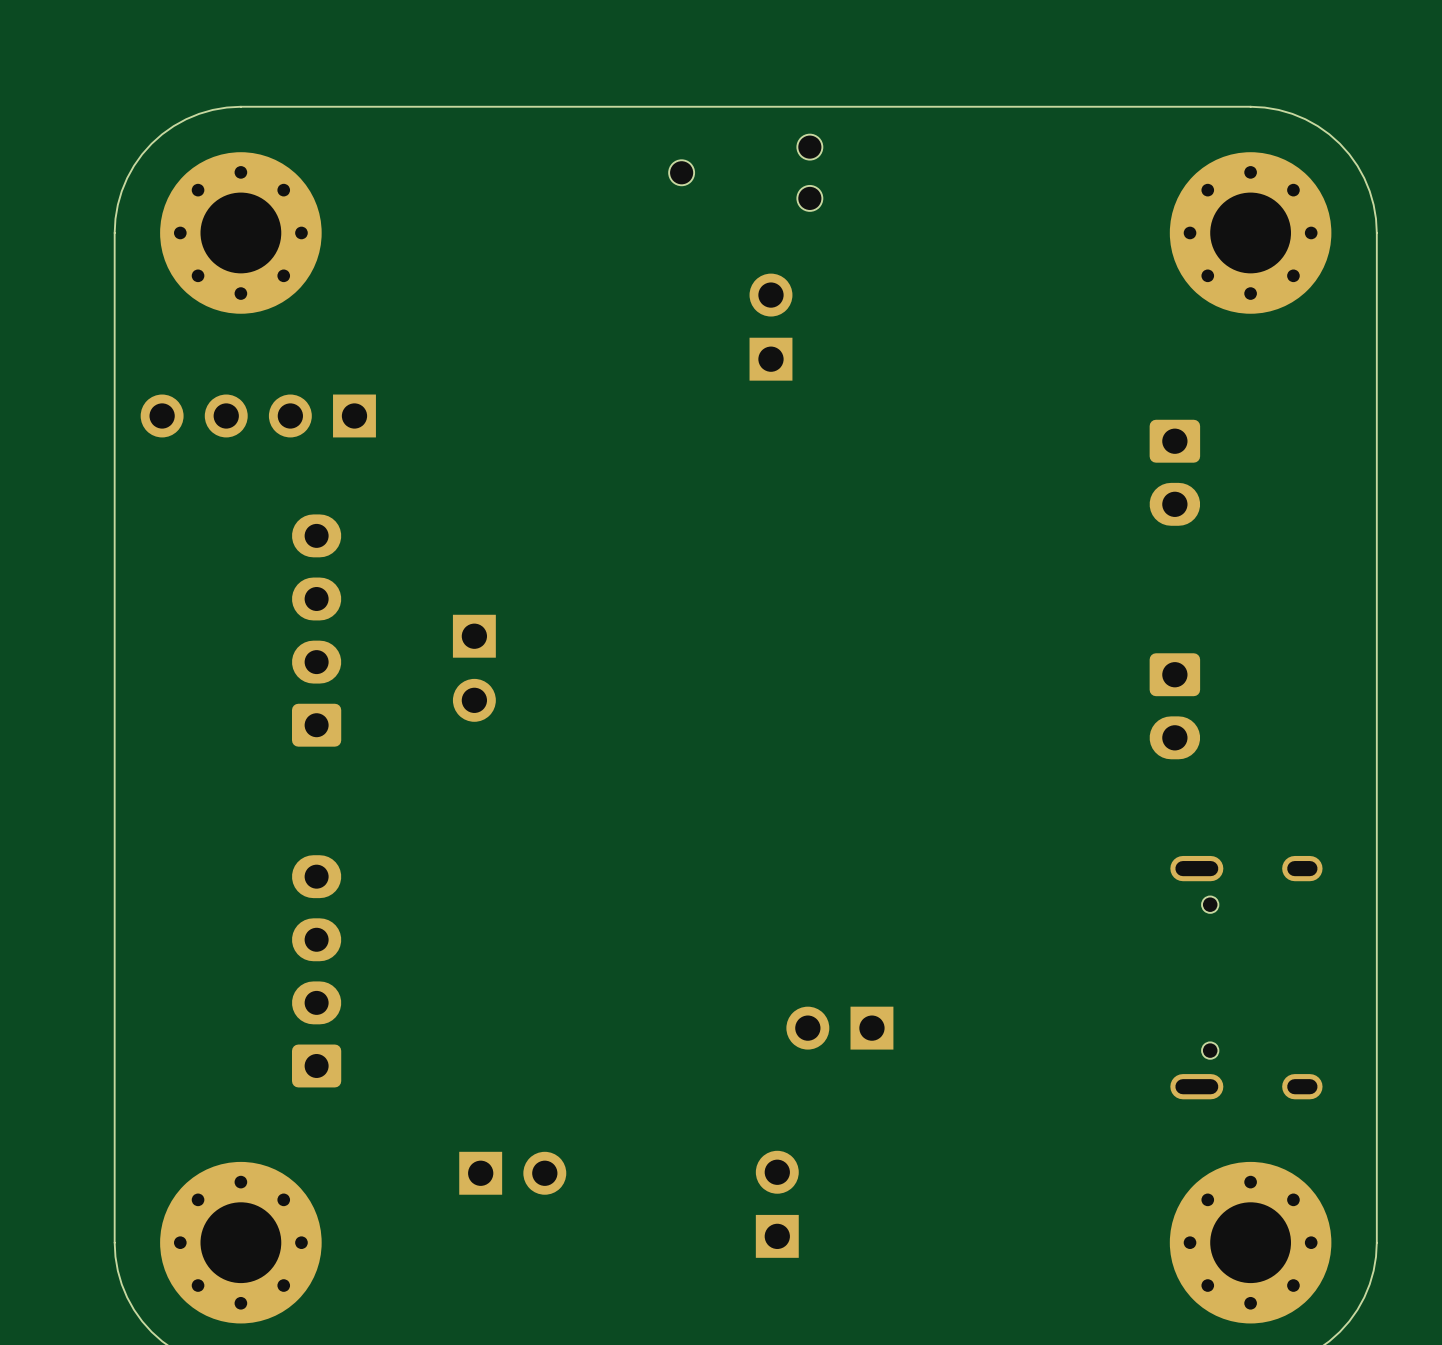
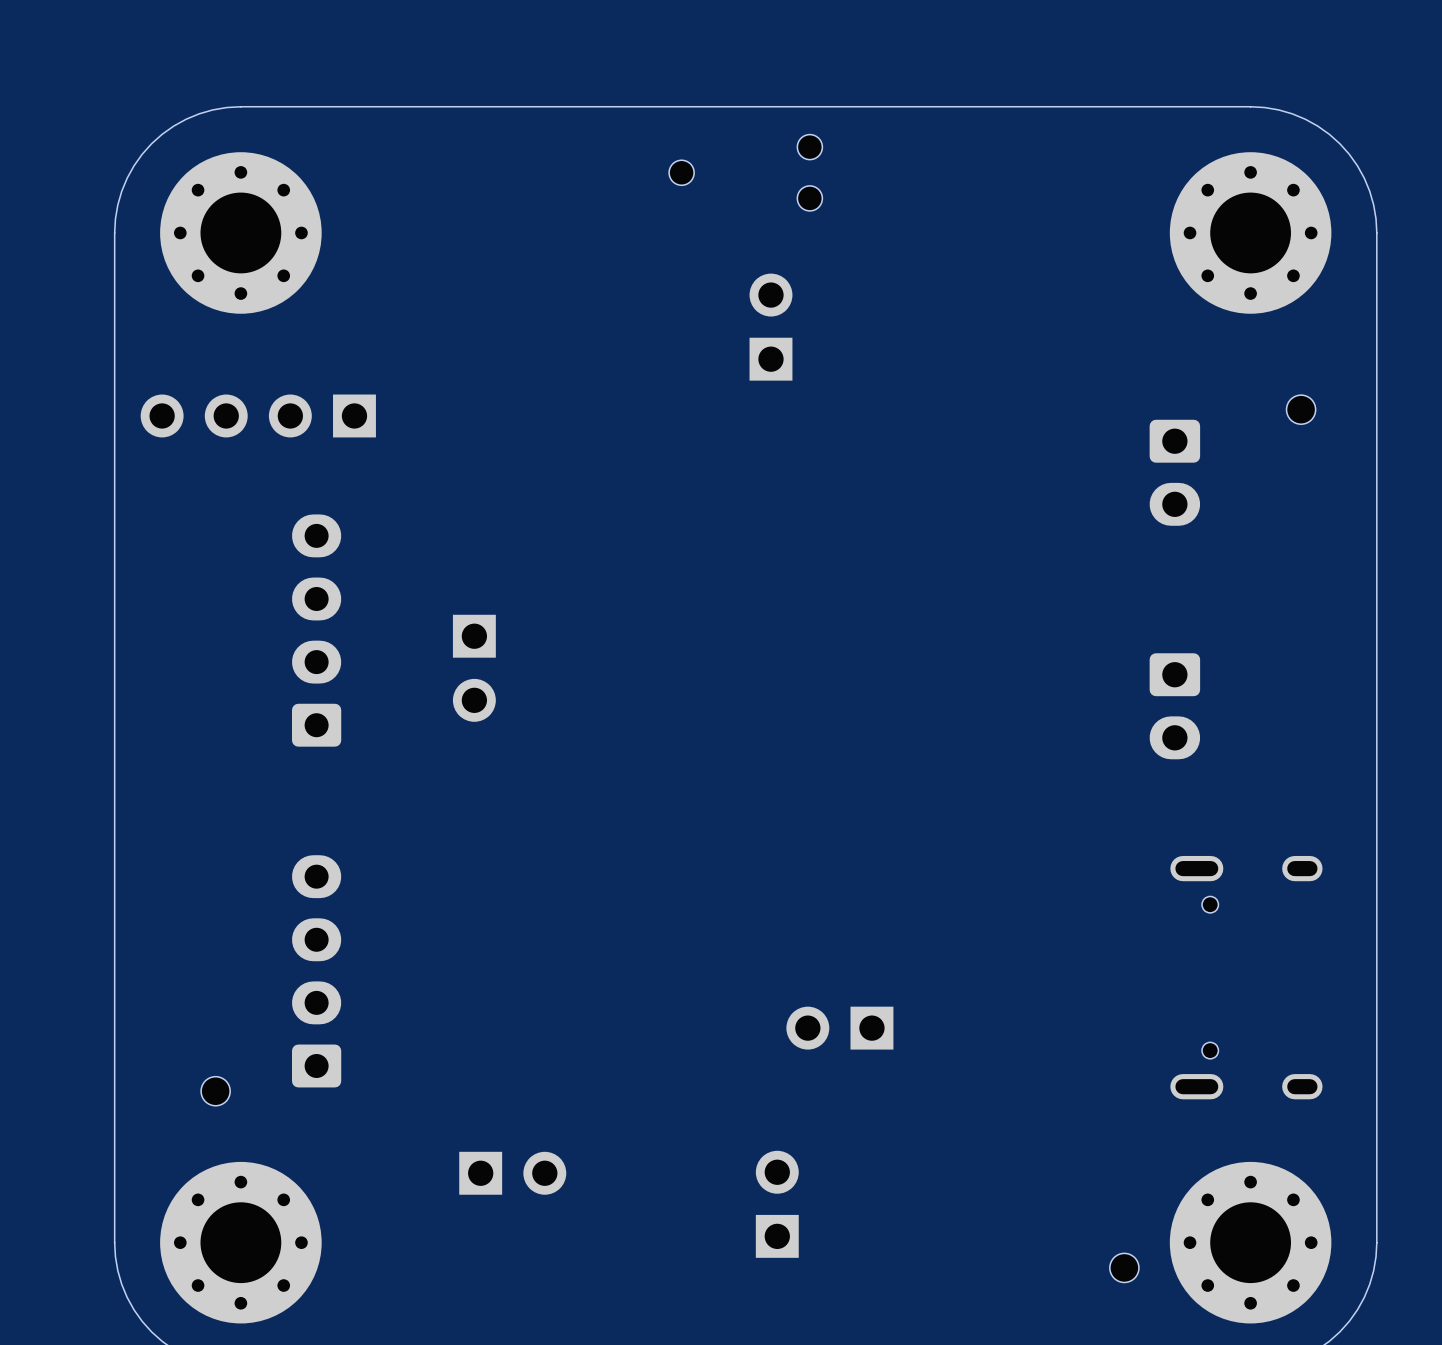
part: none -> (1301, 409)
part: none -> (215, 1091)
part: none -> (1124, 1267)

